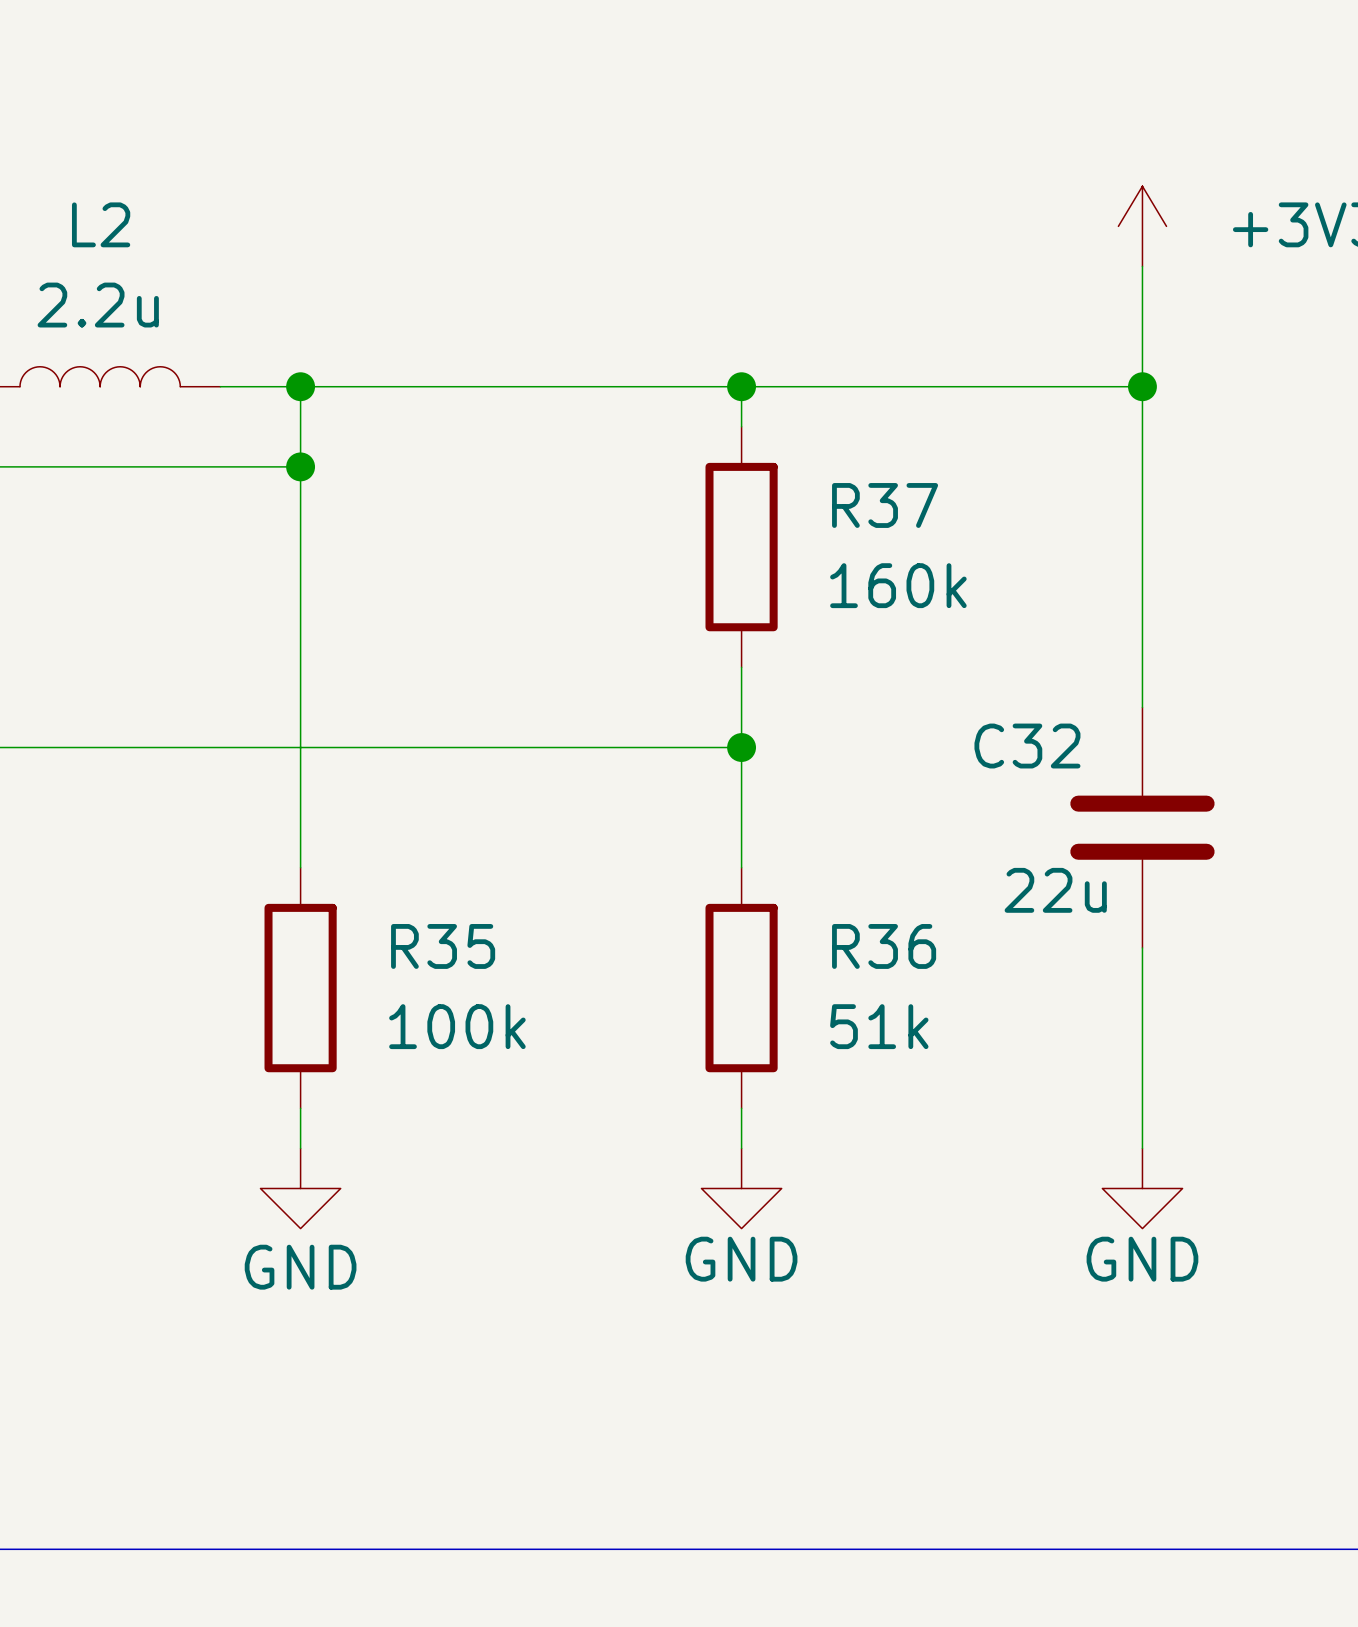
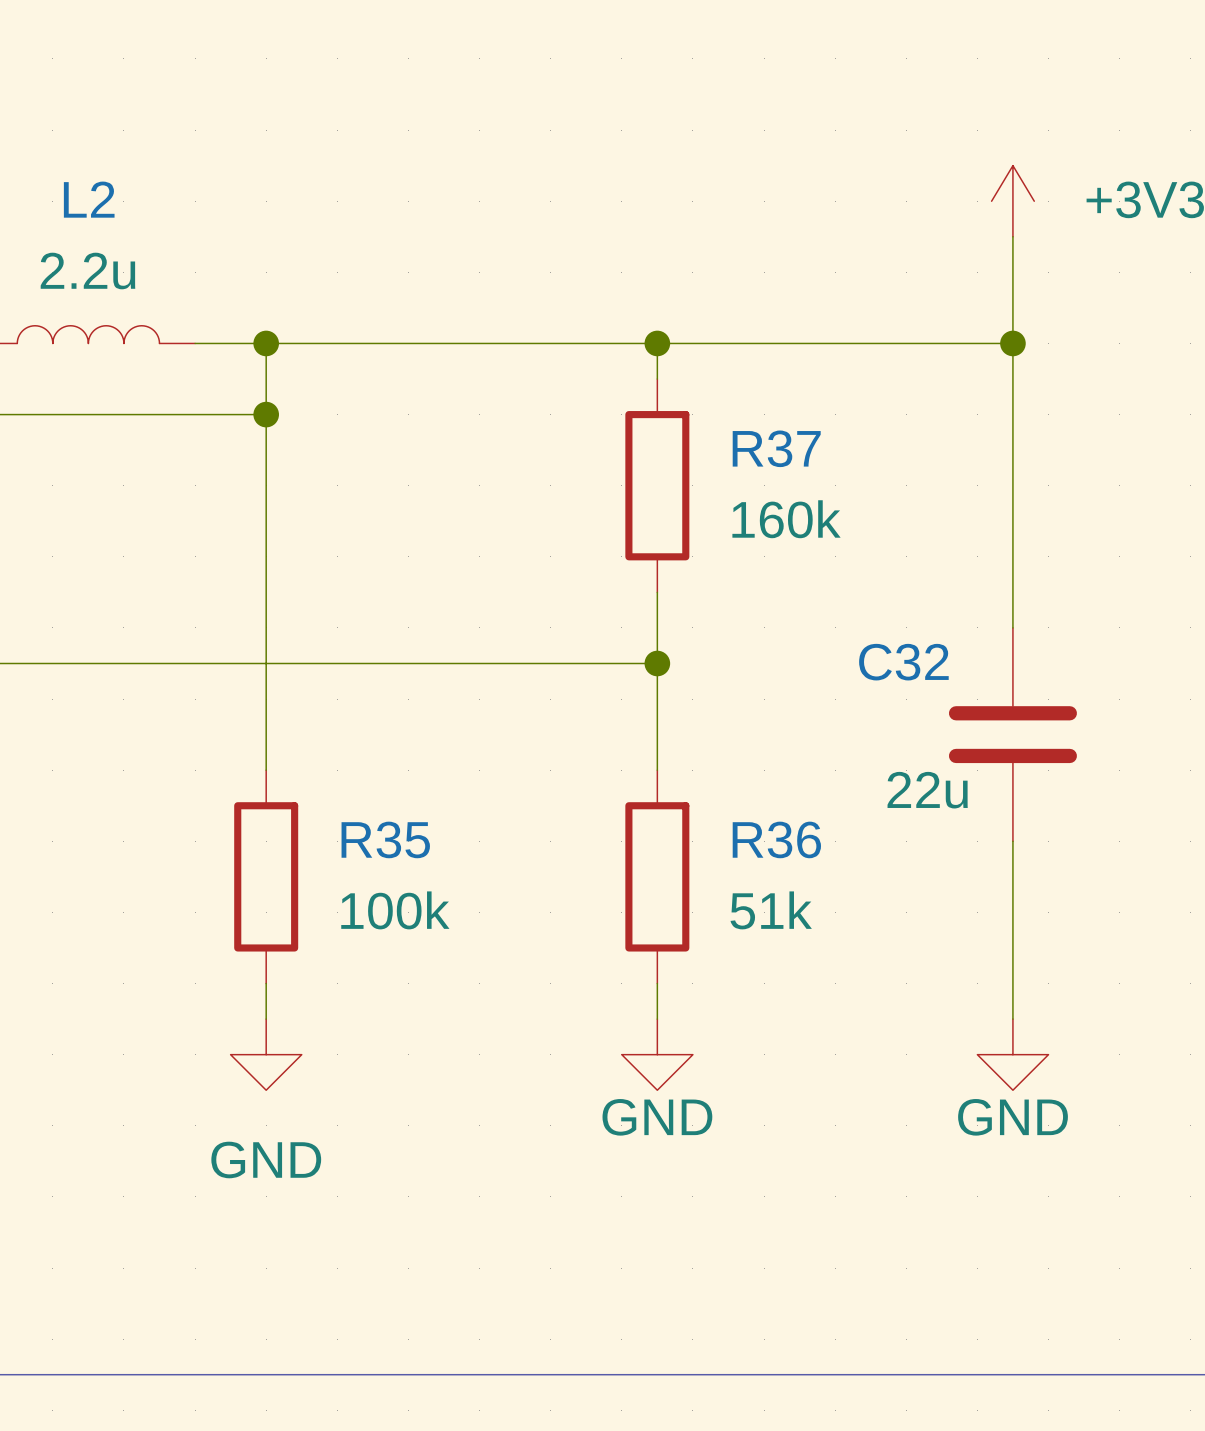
power symbol text position: GND (300, 1267) -> GND (266, 1159)

